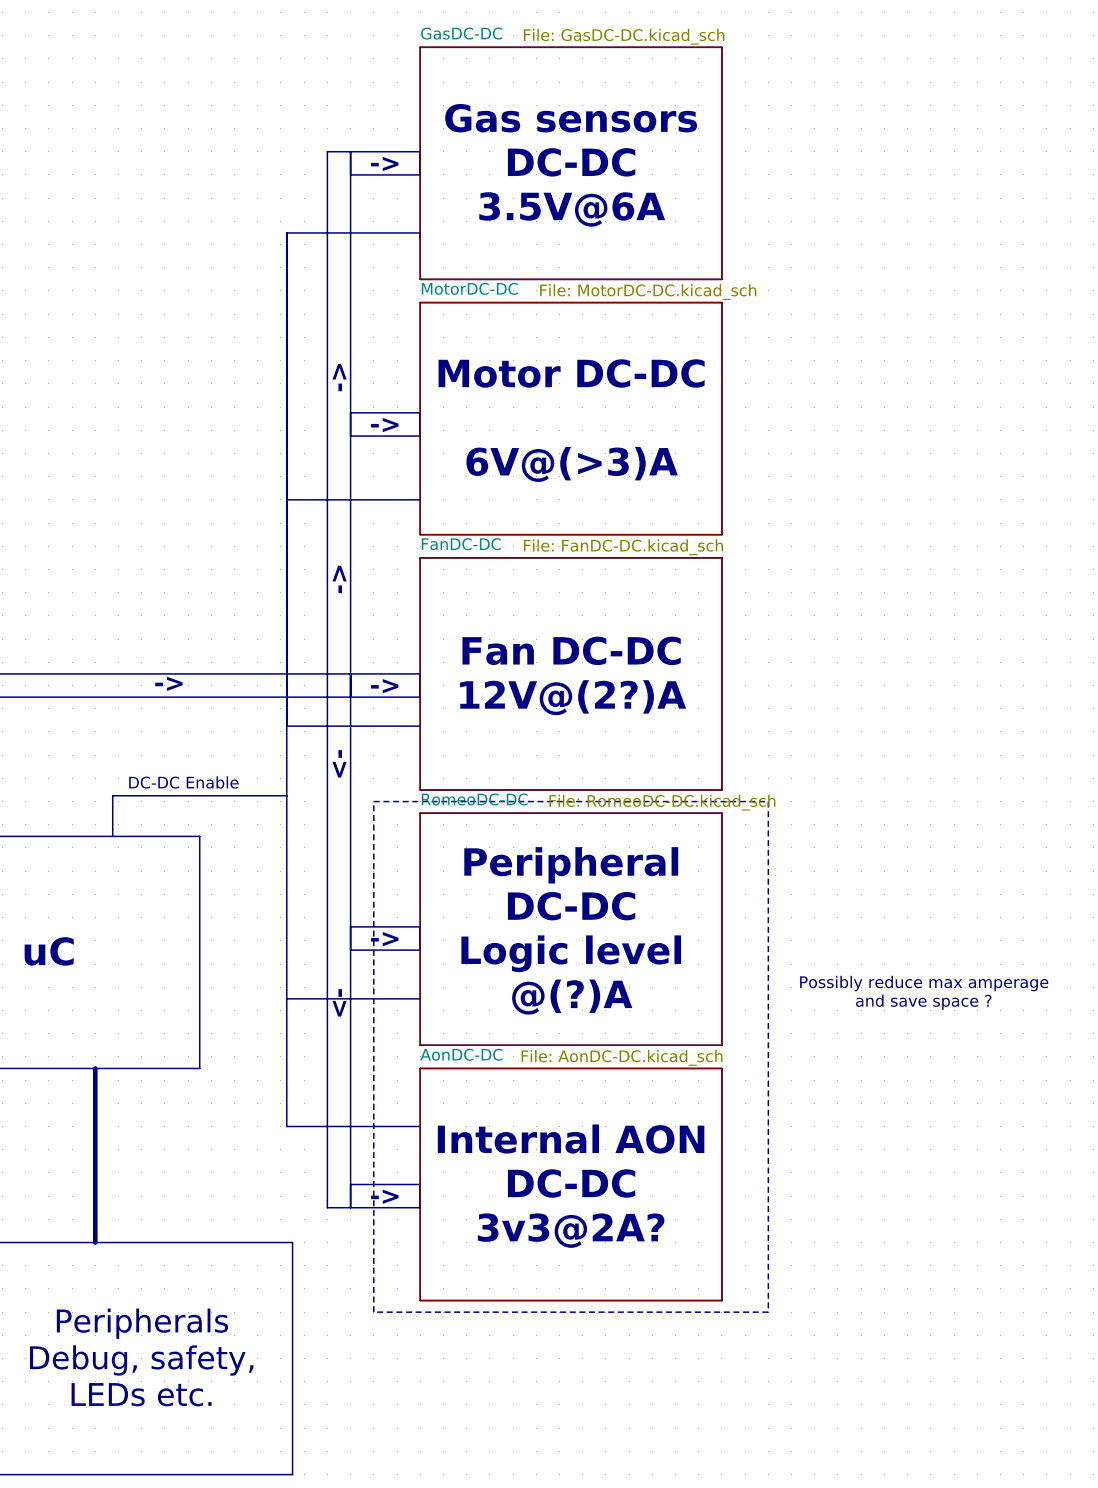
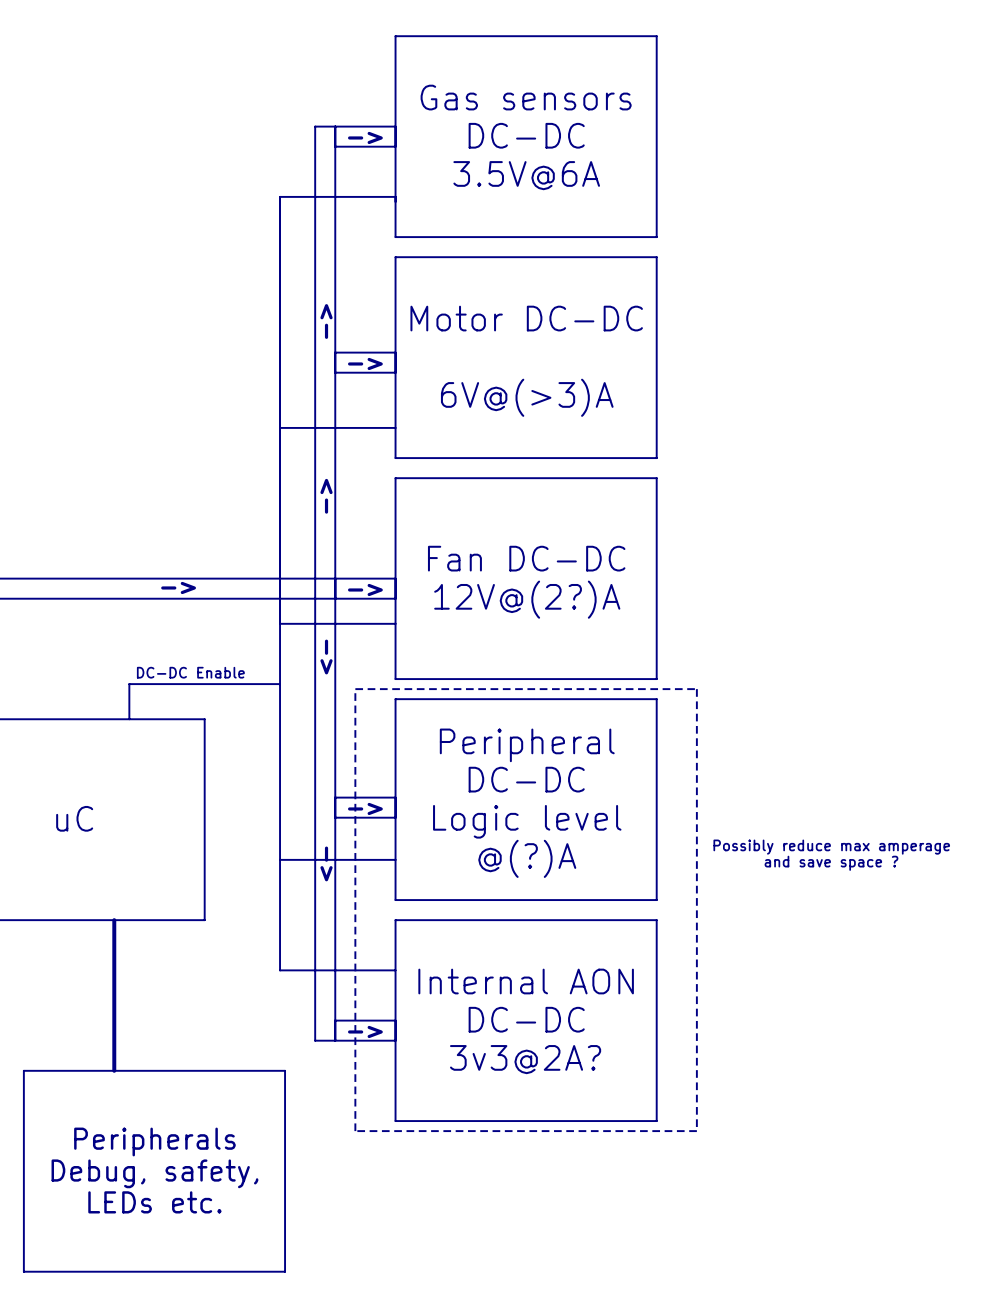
sheet GasDC-DC: File: GasDC-DC.kicad_sch (571, 163) -> none
sheet MotorDC-DC: File: MotorDC-DC.kicad_sch (571, 418) -> none
sheet FanDC-DC: File: FanDC-DC.kicad_sch (571, 673) -> none
sheet RomeoDC-DC: File: RomeoDC-DC.kicad_sch (571, 929) -> none
sheet AonDC-DC: File: AonDC-DC.kicad_sch (571, 1184) -> none

